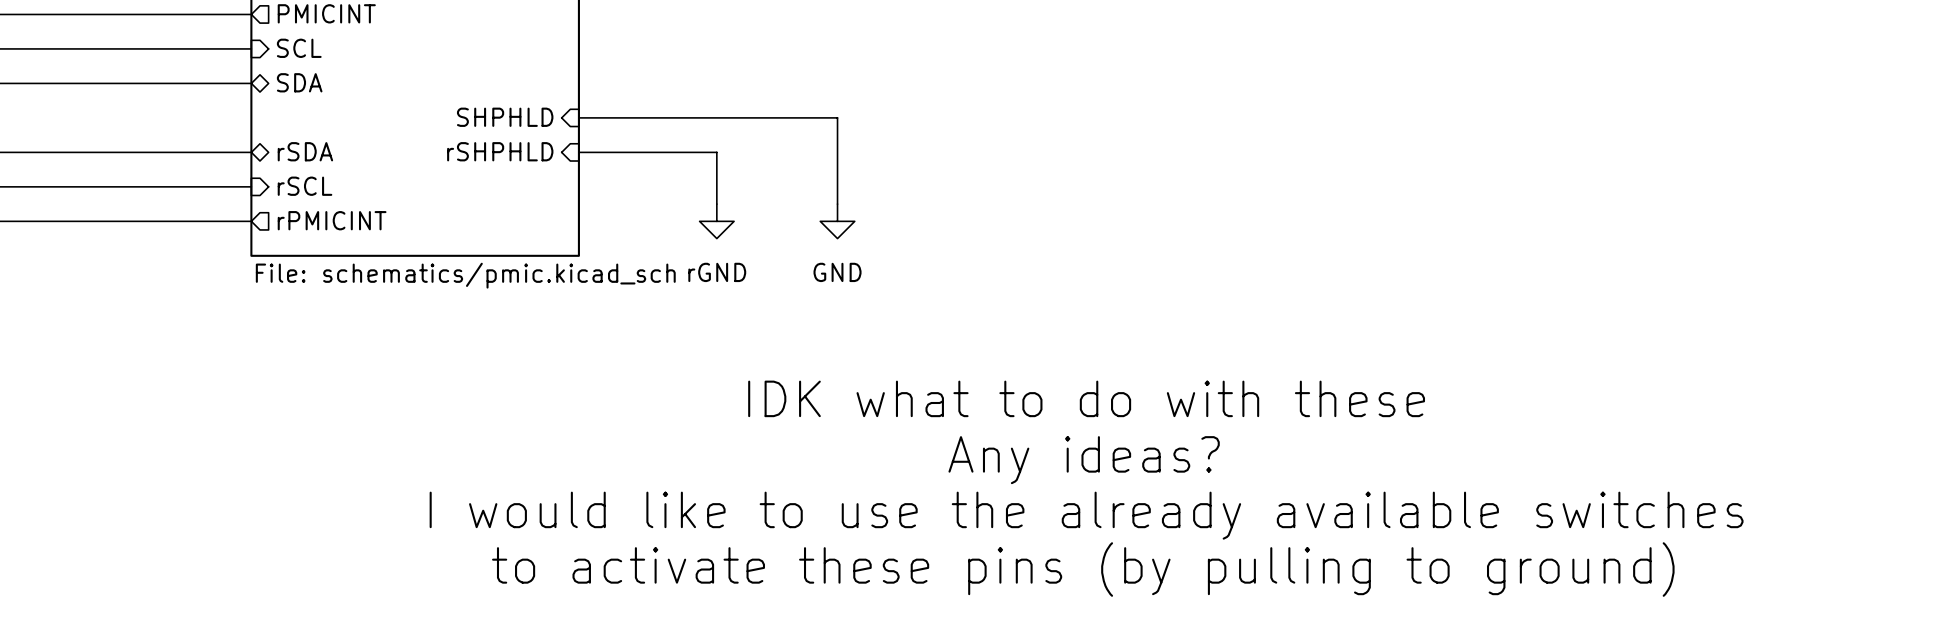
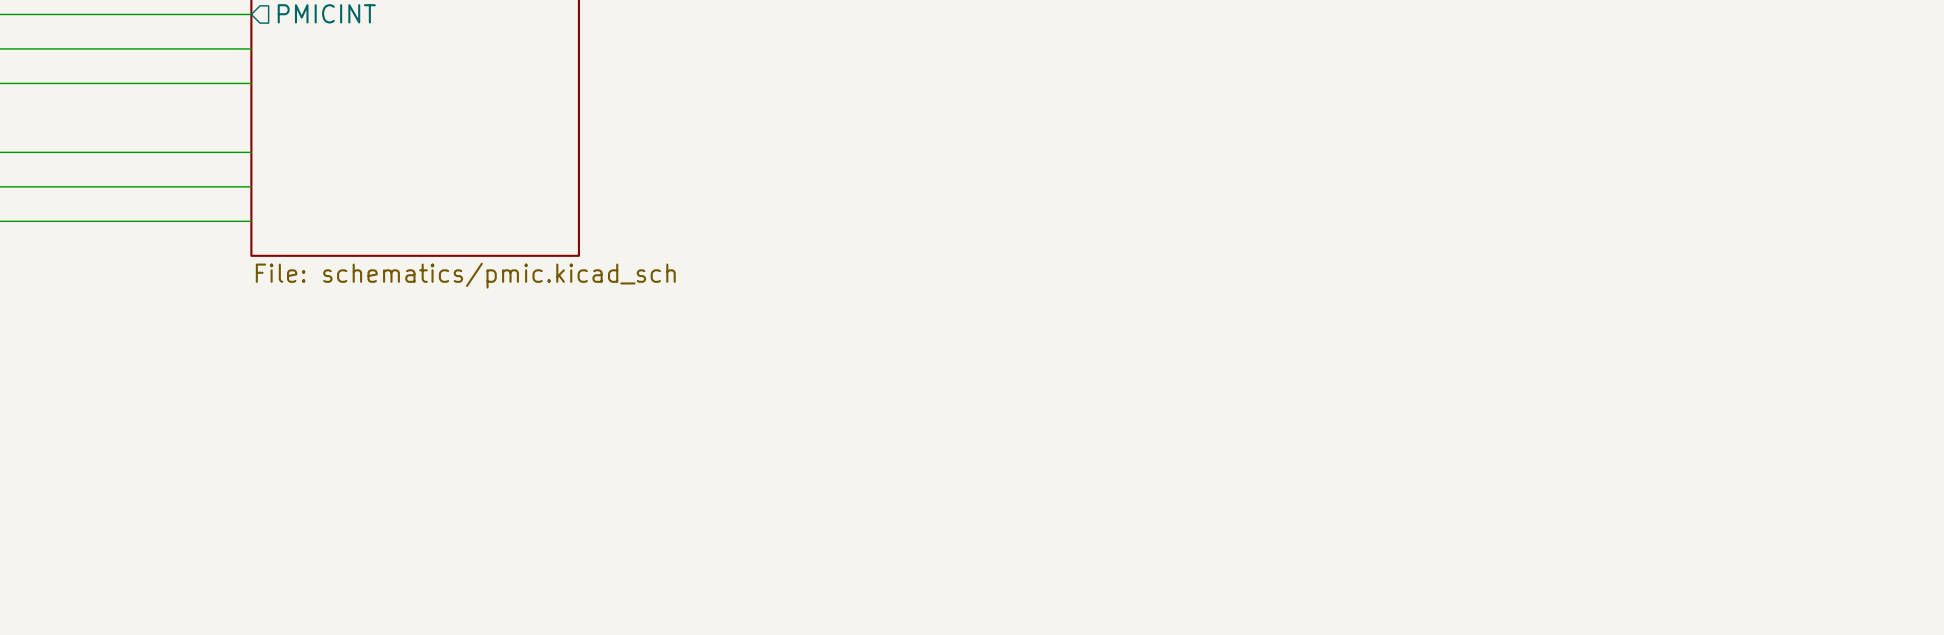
sheet pin: SCL (299, 48) -> none
sheet pin: SDA (299, 82) -> none
sheet pin: SHPHLD (505, 117) -> none
wire: (578, 117) (837, 117) (837, 204) -> none
sheet pin: rSDA (305, 151) -> none
sheet pin: rSHPHLD (500, 151) -> none
wire: (578, 152) (716, 152) (716, 204) -> none
sheet pin: rSCL (305, 186) -> none
sheet pin: rPMICINT (332, 220) -> none
power symbol: rGND (716, 221) -> none
power symbol: GND (837, 221) -> none
text: IDK what to do with these (1086, 398) -> none
text: Any ideas? (1084, 460) -> none
text: I would like to use the already available switches (1086, 515) -> none
text: to activate these pins (by pulling to ground) (1083, 569) -> none

